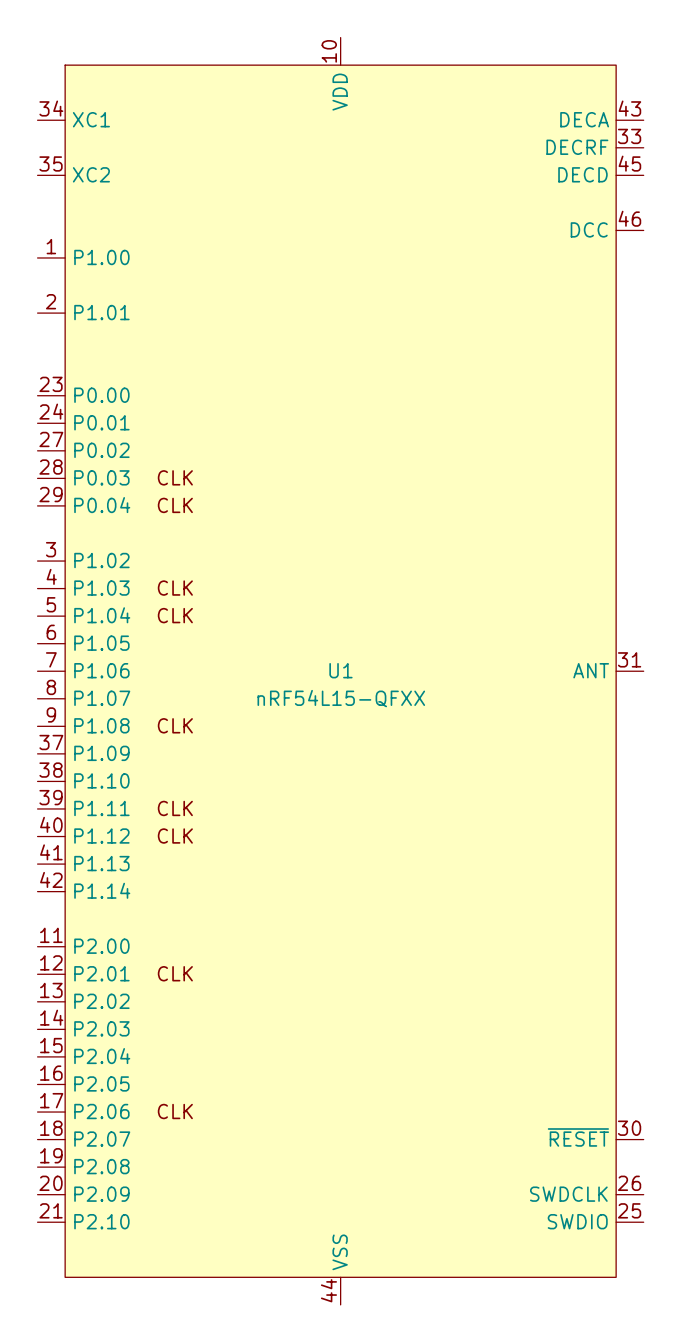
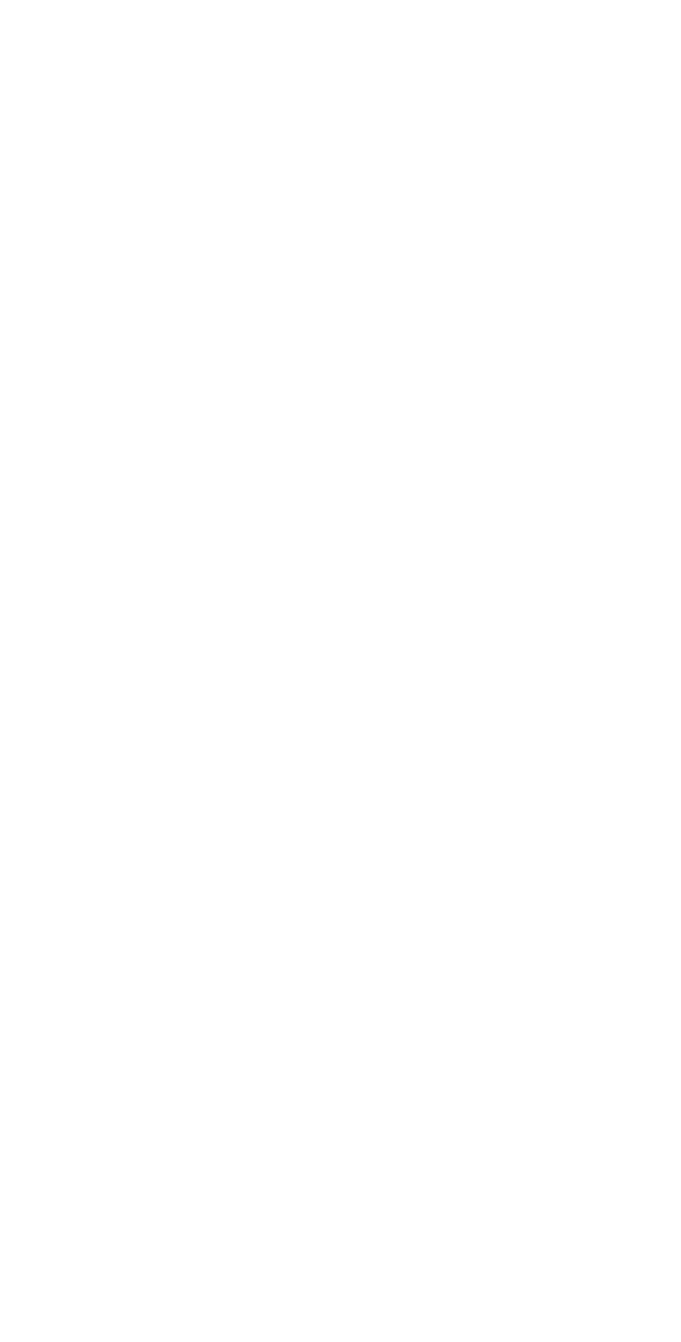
U1: nRF54L15-QFXX (340, 671) -> none

